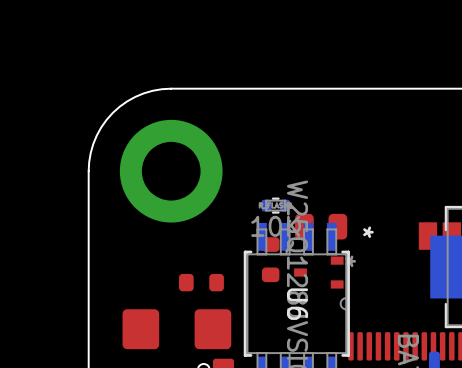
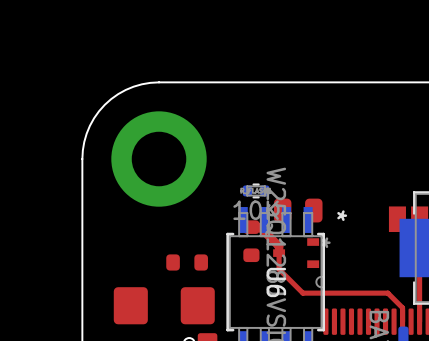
top track: none -> (251, 227) (259, 227) (279, 246) (279, 269) (302, 293) (387, 293) (402, 307) (402, 321)
top track: none -> (418, 266) (419, 321)

